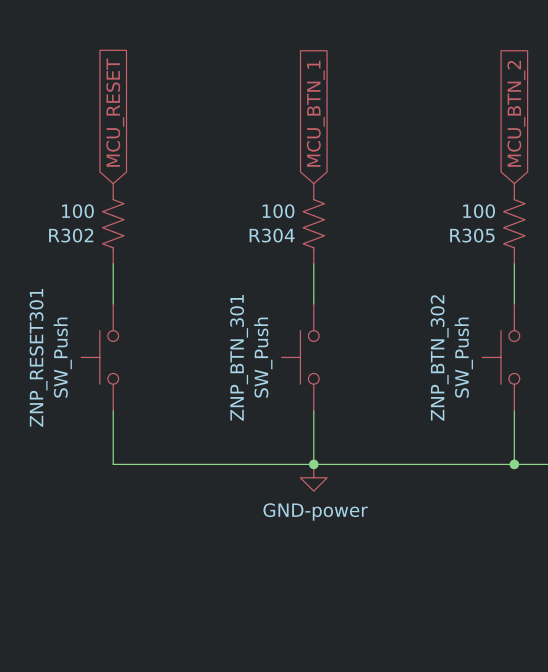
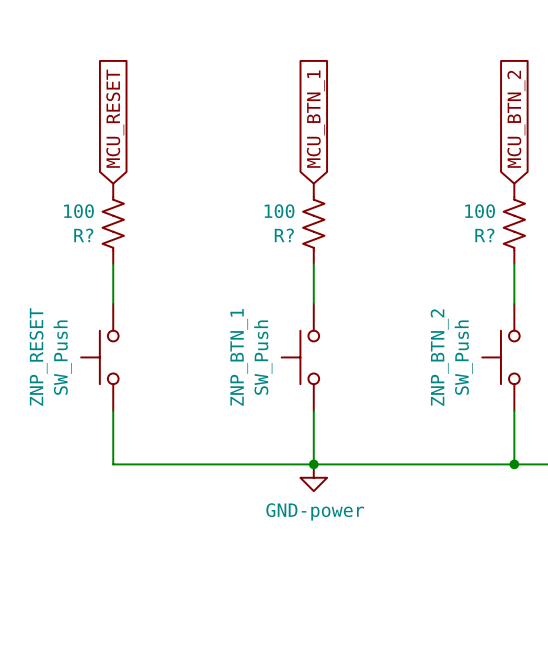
R302 name: R302 (71, 235) -> R? (83, 235)
R304 name: R304 (272, 235) -> R? (284, 235)
R305 name: R305 (472, 235) -> R? (484, 235)
ZNP_RESET301 name: ZNP_RESET301 (38, 357) -> ZNP_RESET (38, 356)
ZNP_BTN_301 name: ZNP_BTN_301 (239, 357) -> ZNP_BTN_1 (239, 357)
ZNP_BTN_302 name: ZNP_BTN_302 (439, 357) -> ZNP_BTN_2 (439, 357)

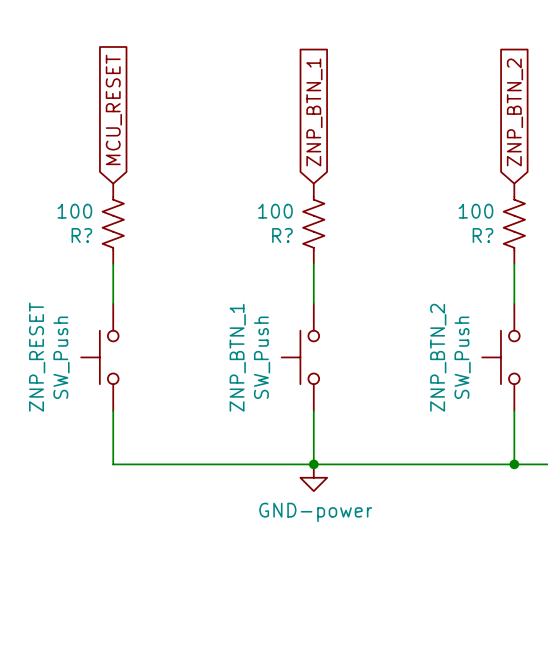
global label: MCU_BTN_1 (315, 119) -> ZNP_BTN_1 (314, 112)
global label: MCU_BTN_2 (516, 119) -> ZNP_BTN_2 (514, 112)

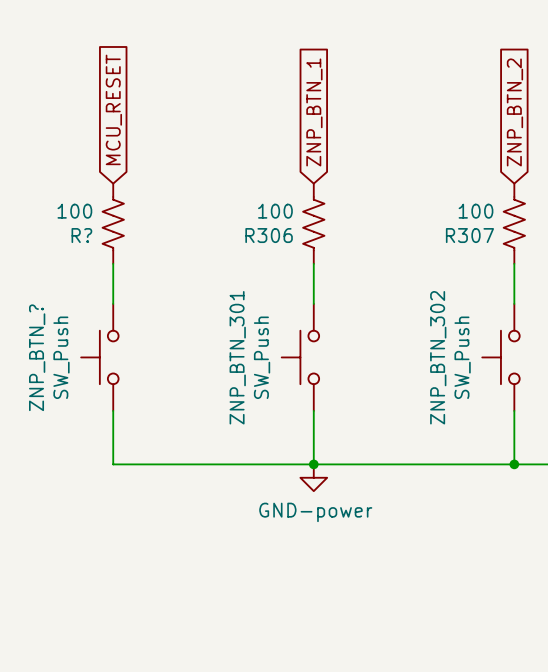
R? name: R? (282, 235) -> R306 (269, 235)
R? name: R? (483, 235) -> R307 (469, 235)
ZNP_RESET name: ZNP_RESET (37, 357) -> ZNP_BTN_? (37, 357)
ZNP_BTN_1 name: ZNP_BTN_1 (237, 357) -> ZNP_BTN_301 (237, 357)
ZNP_BTN_2 name: ZNP_BTN_2 (438, 357) -> ZNP_BTN_302 (438, 357)

